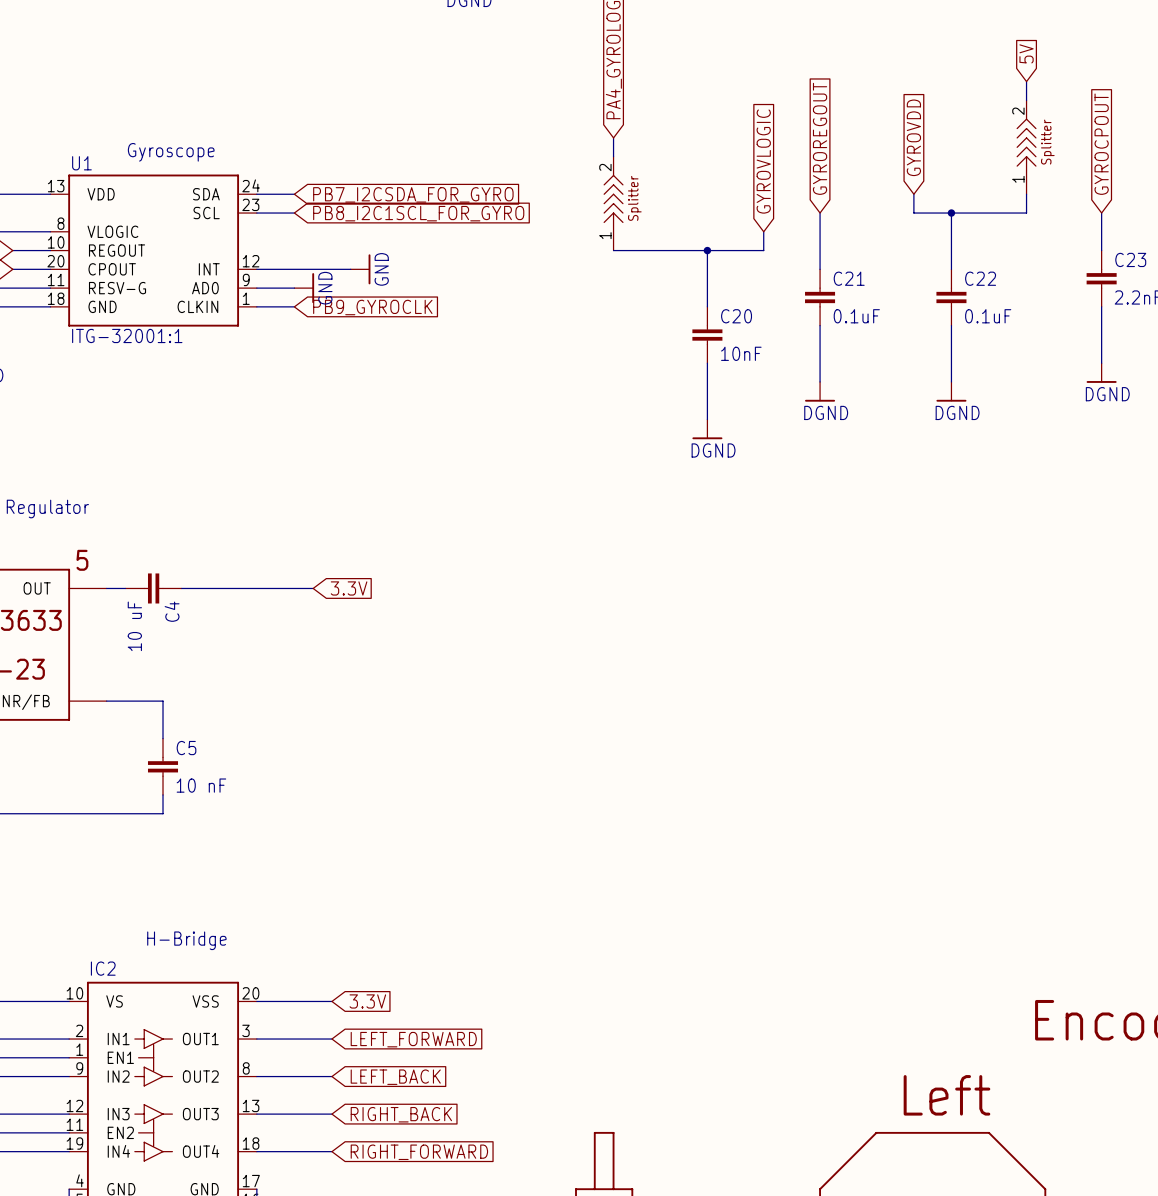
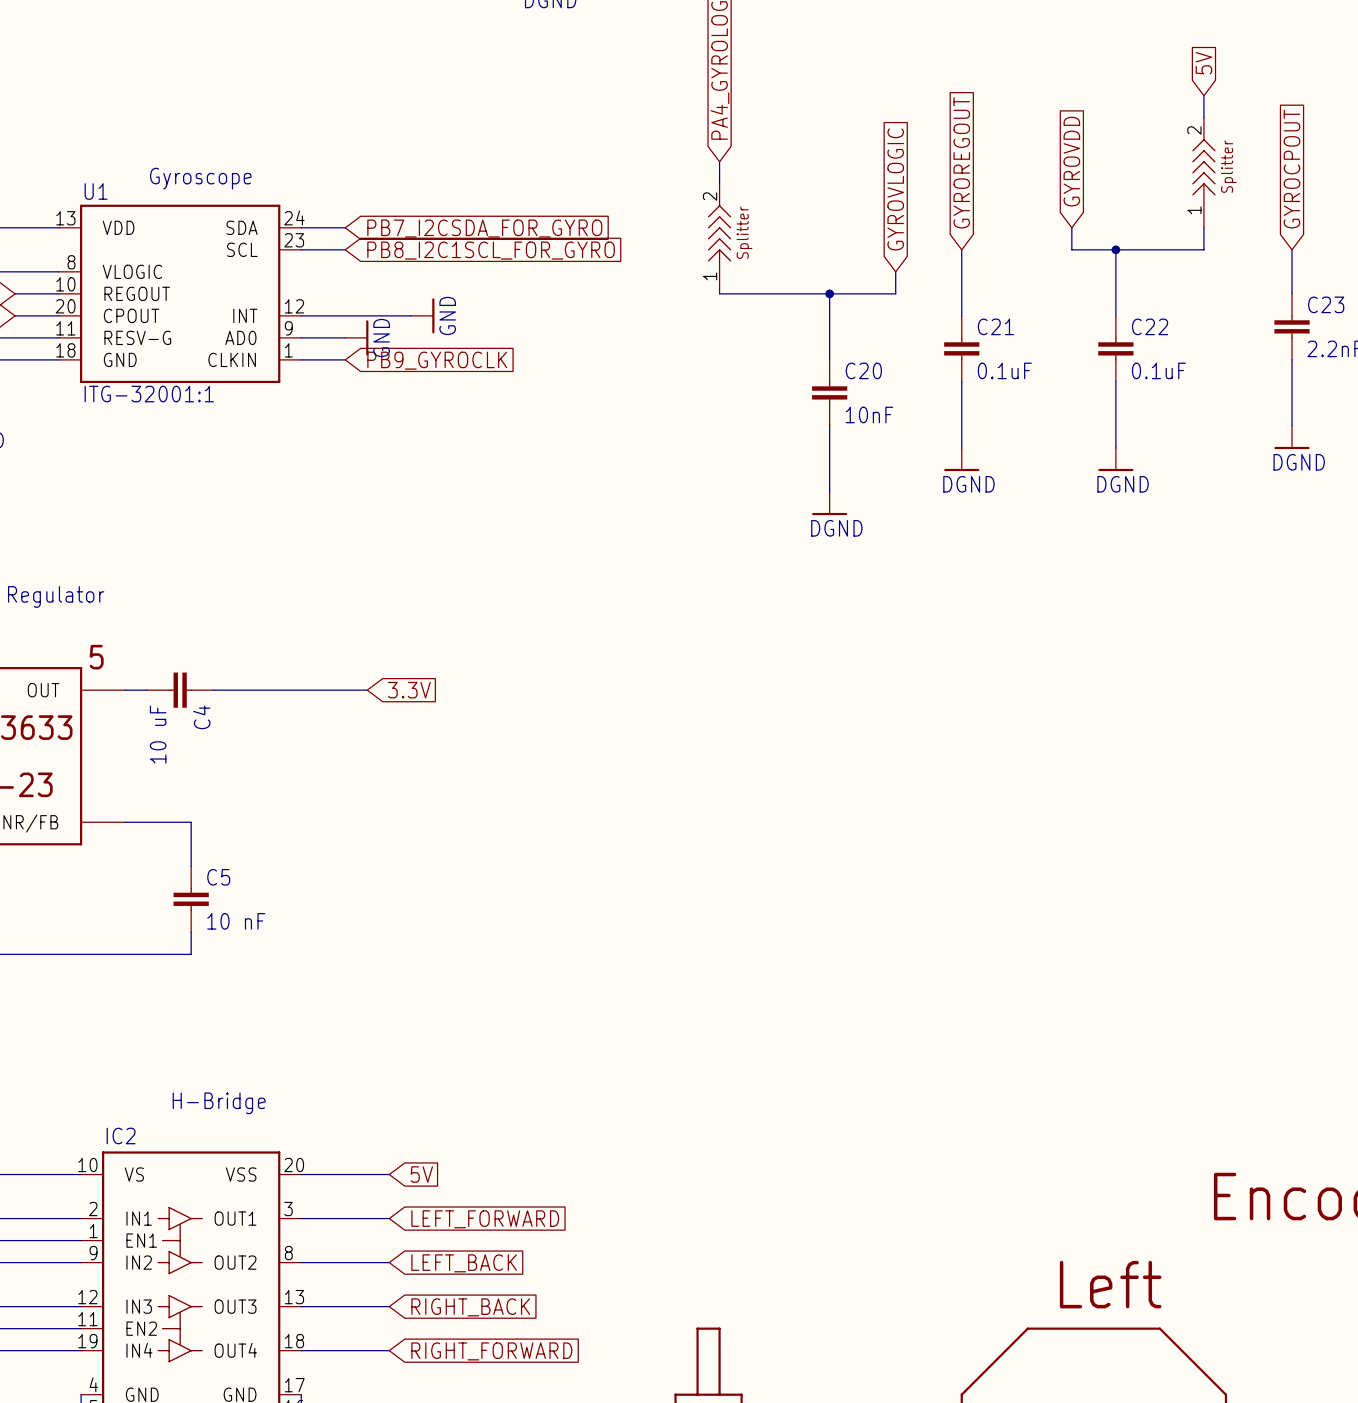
global label: 3.3V (367, 1001) -> 5V (421, 1174)

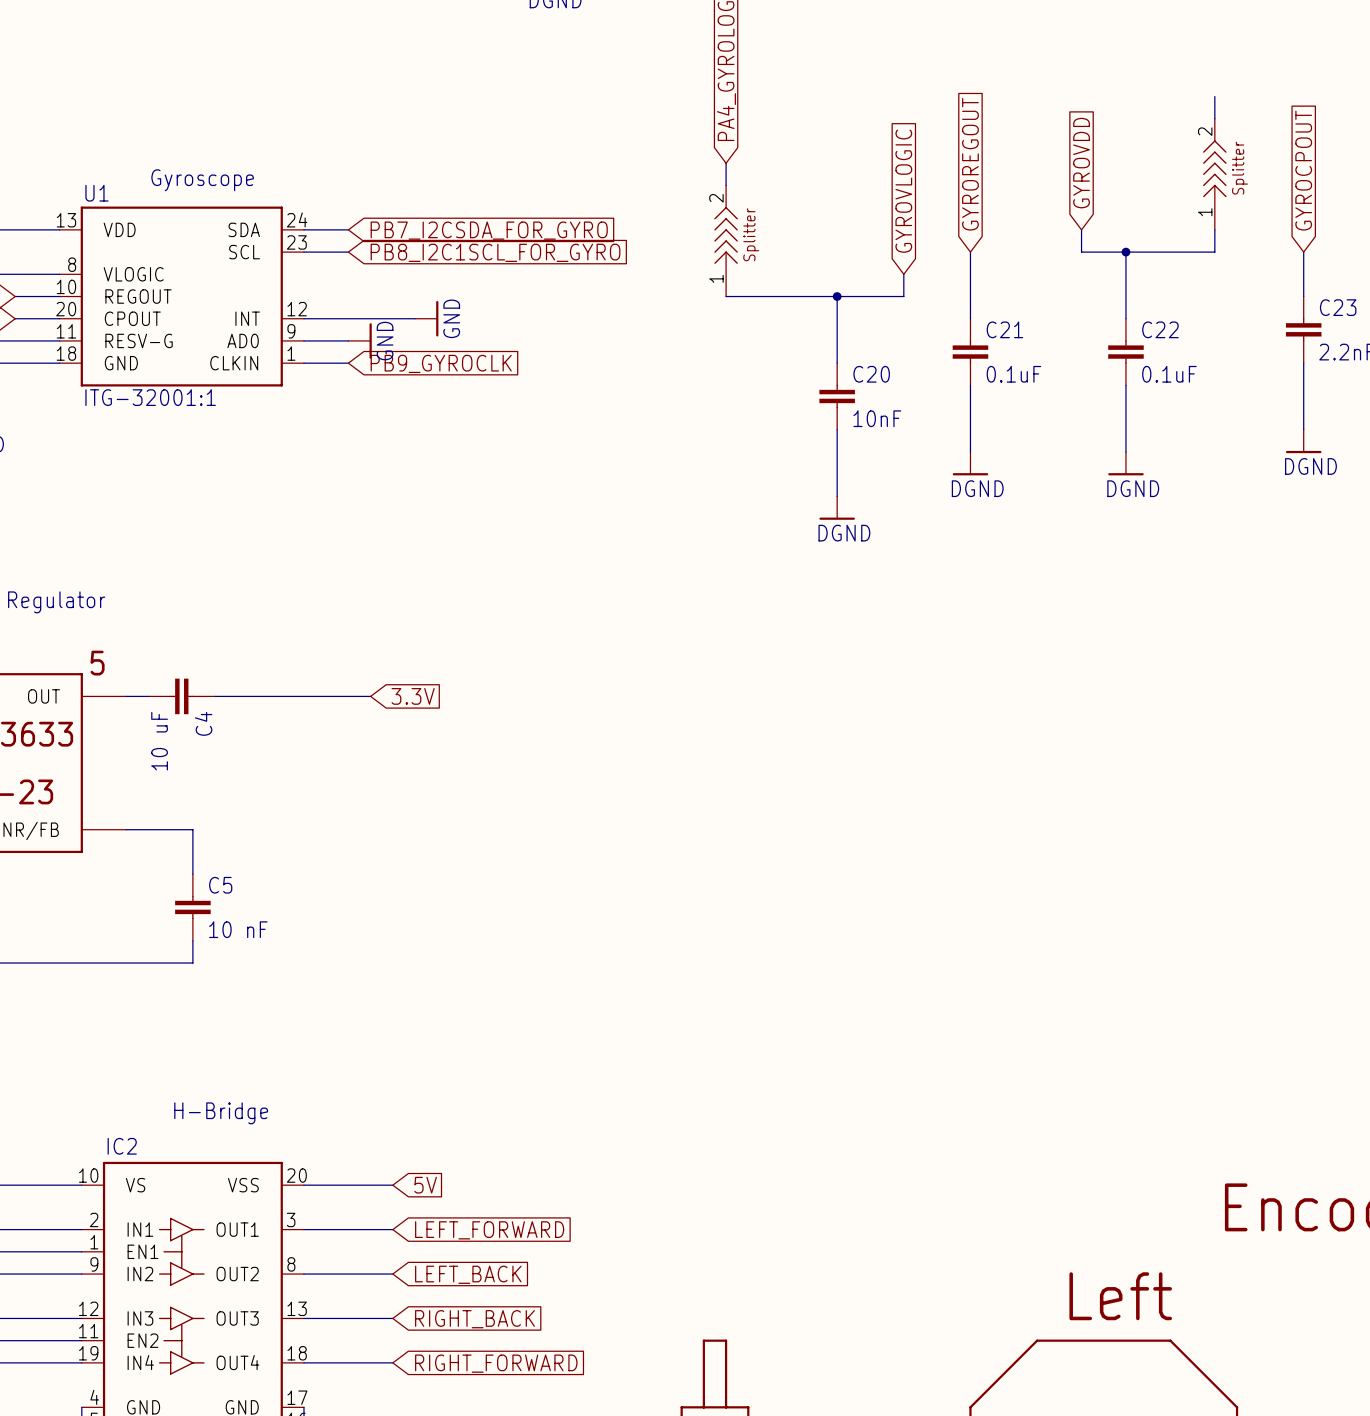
global label: 5V (1203, 63) -> none

